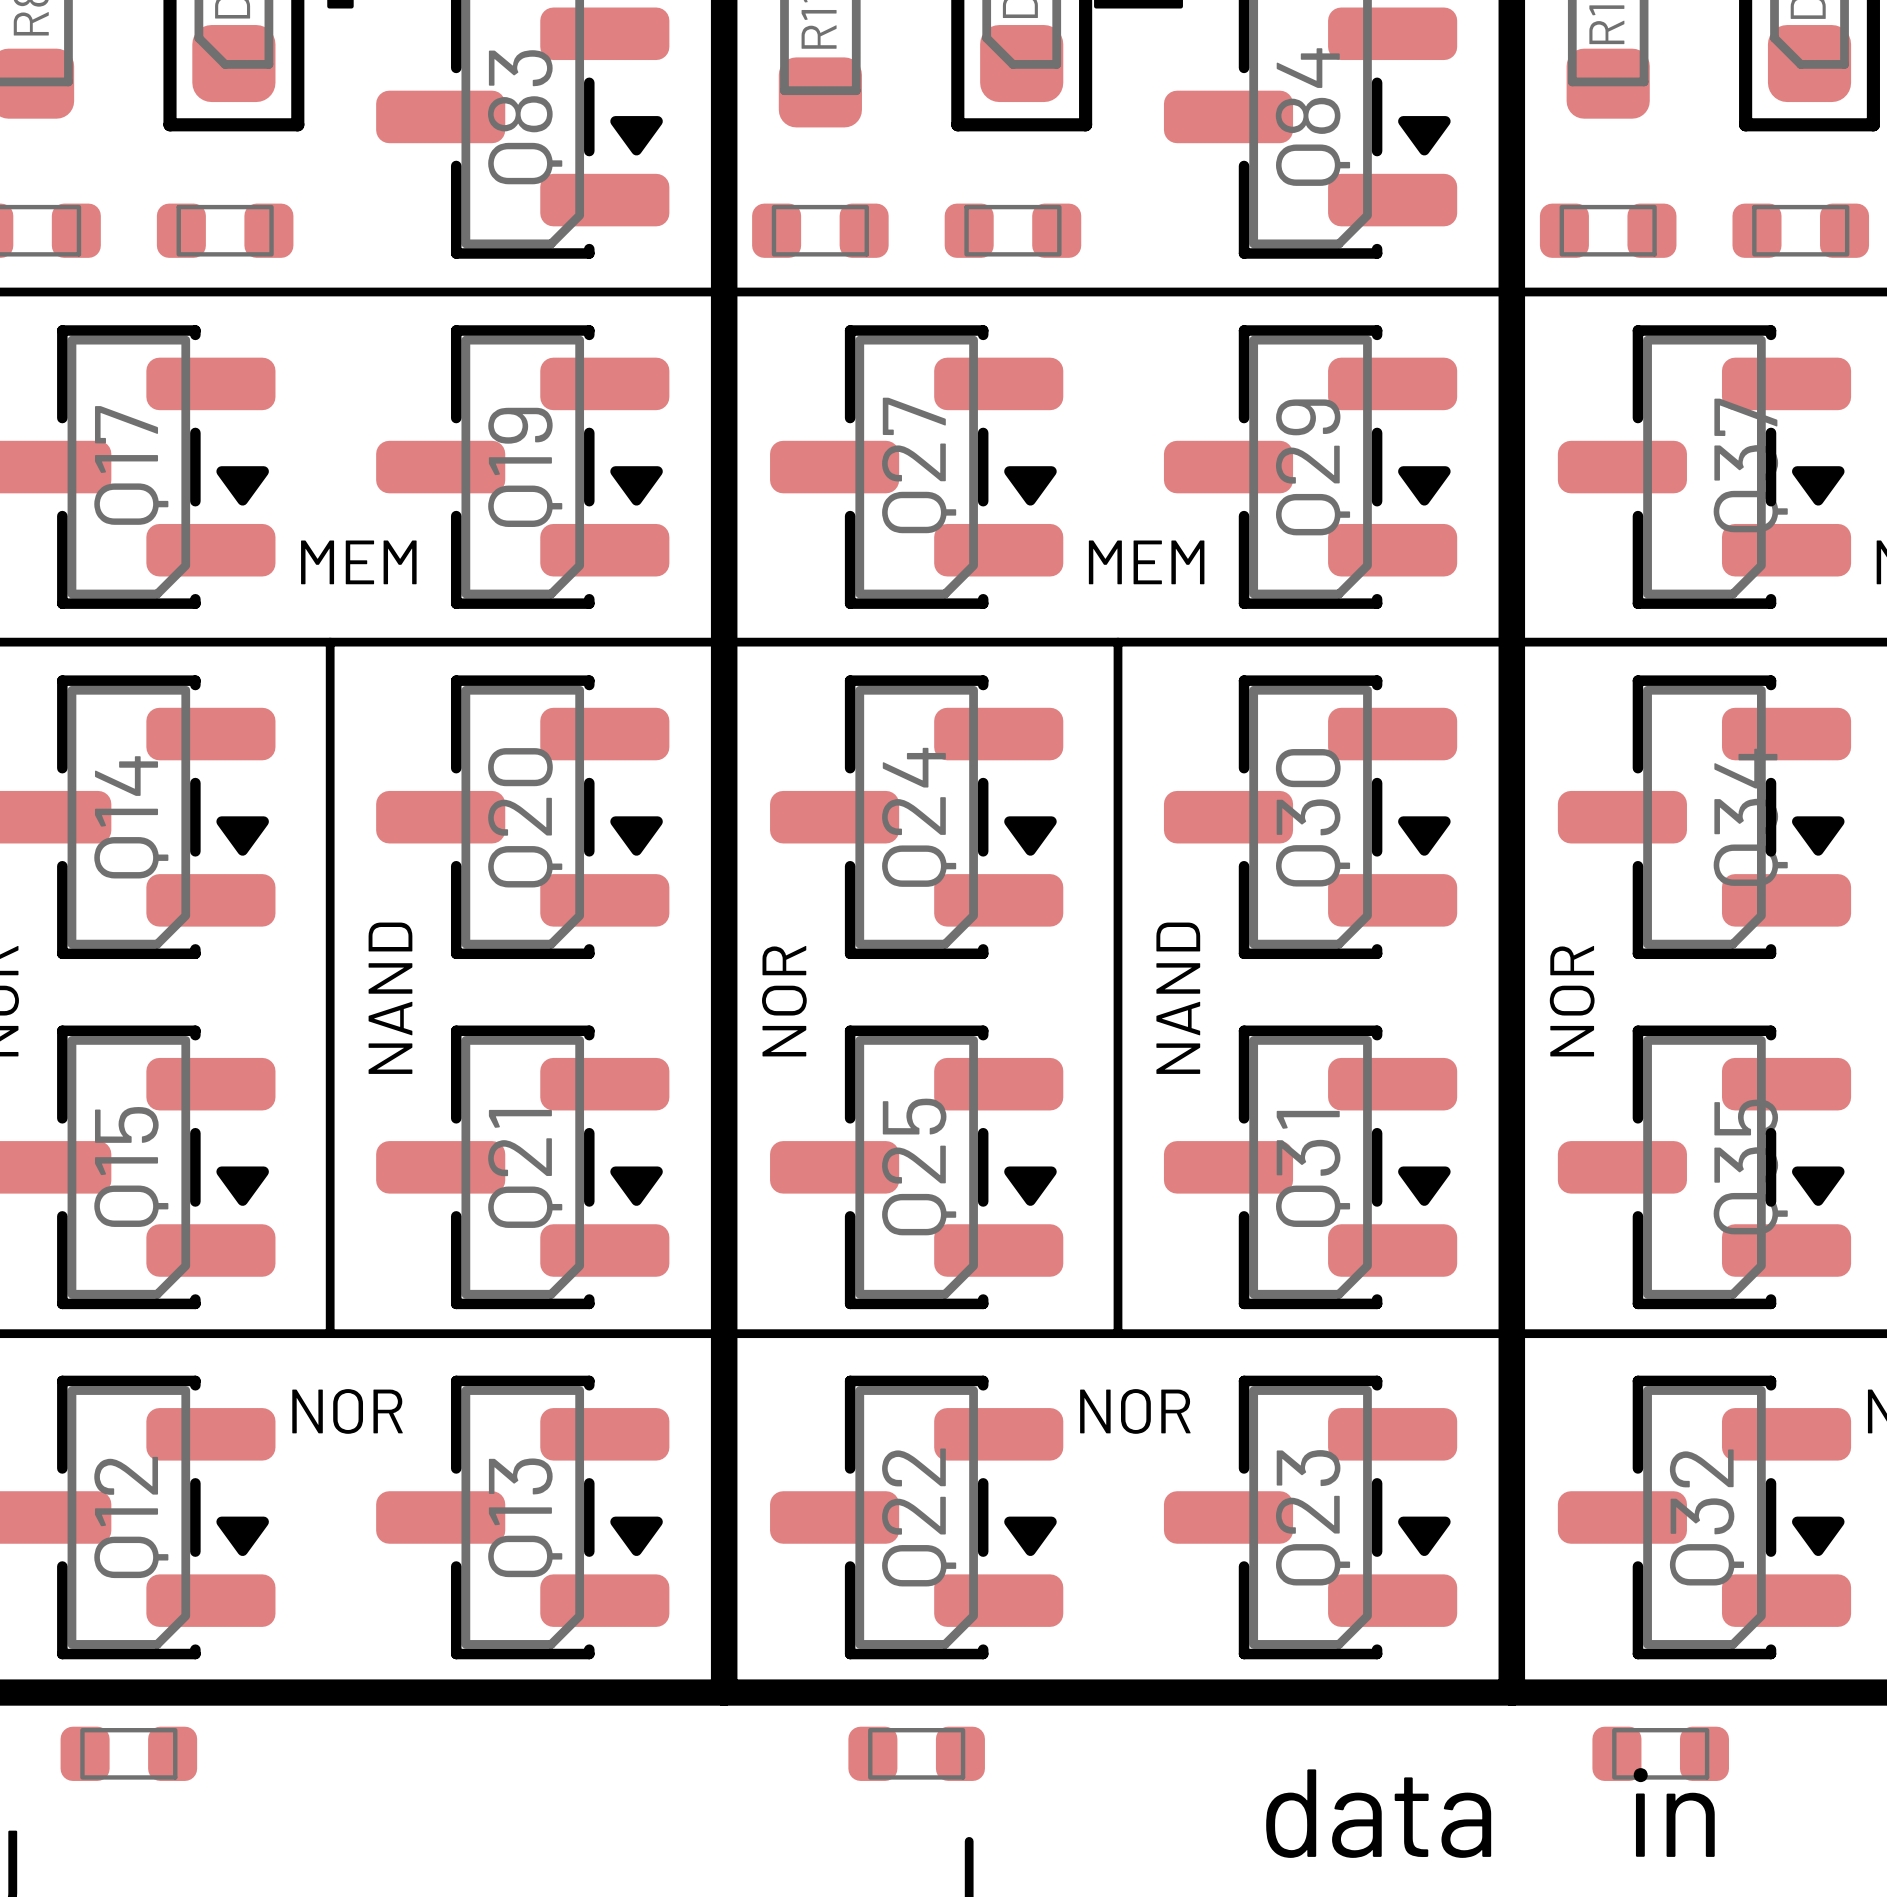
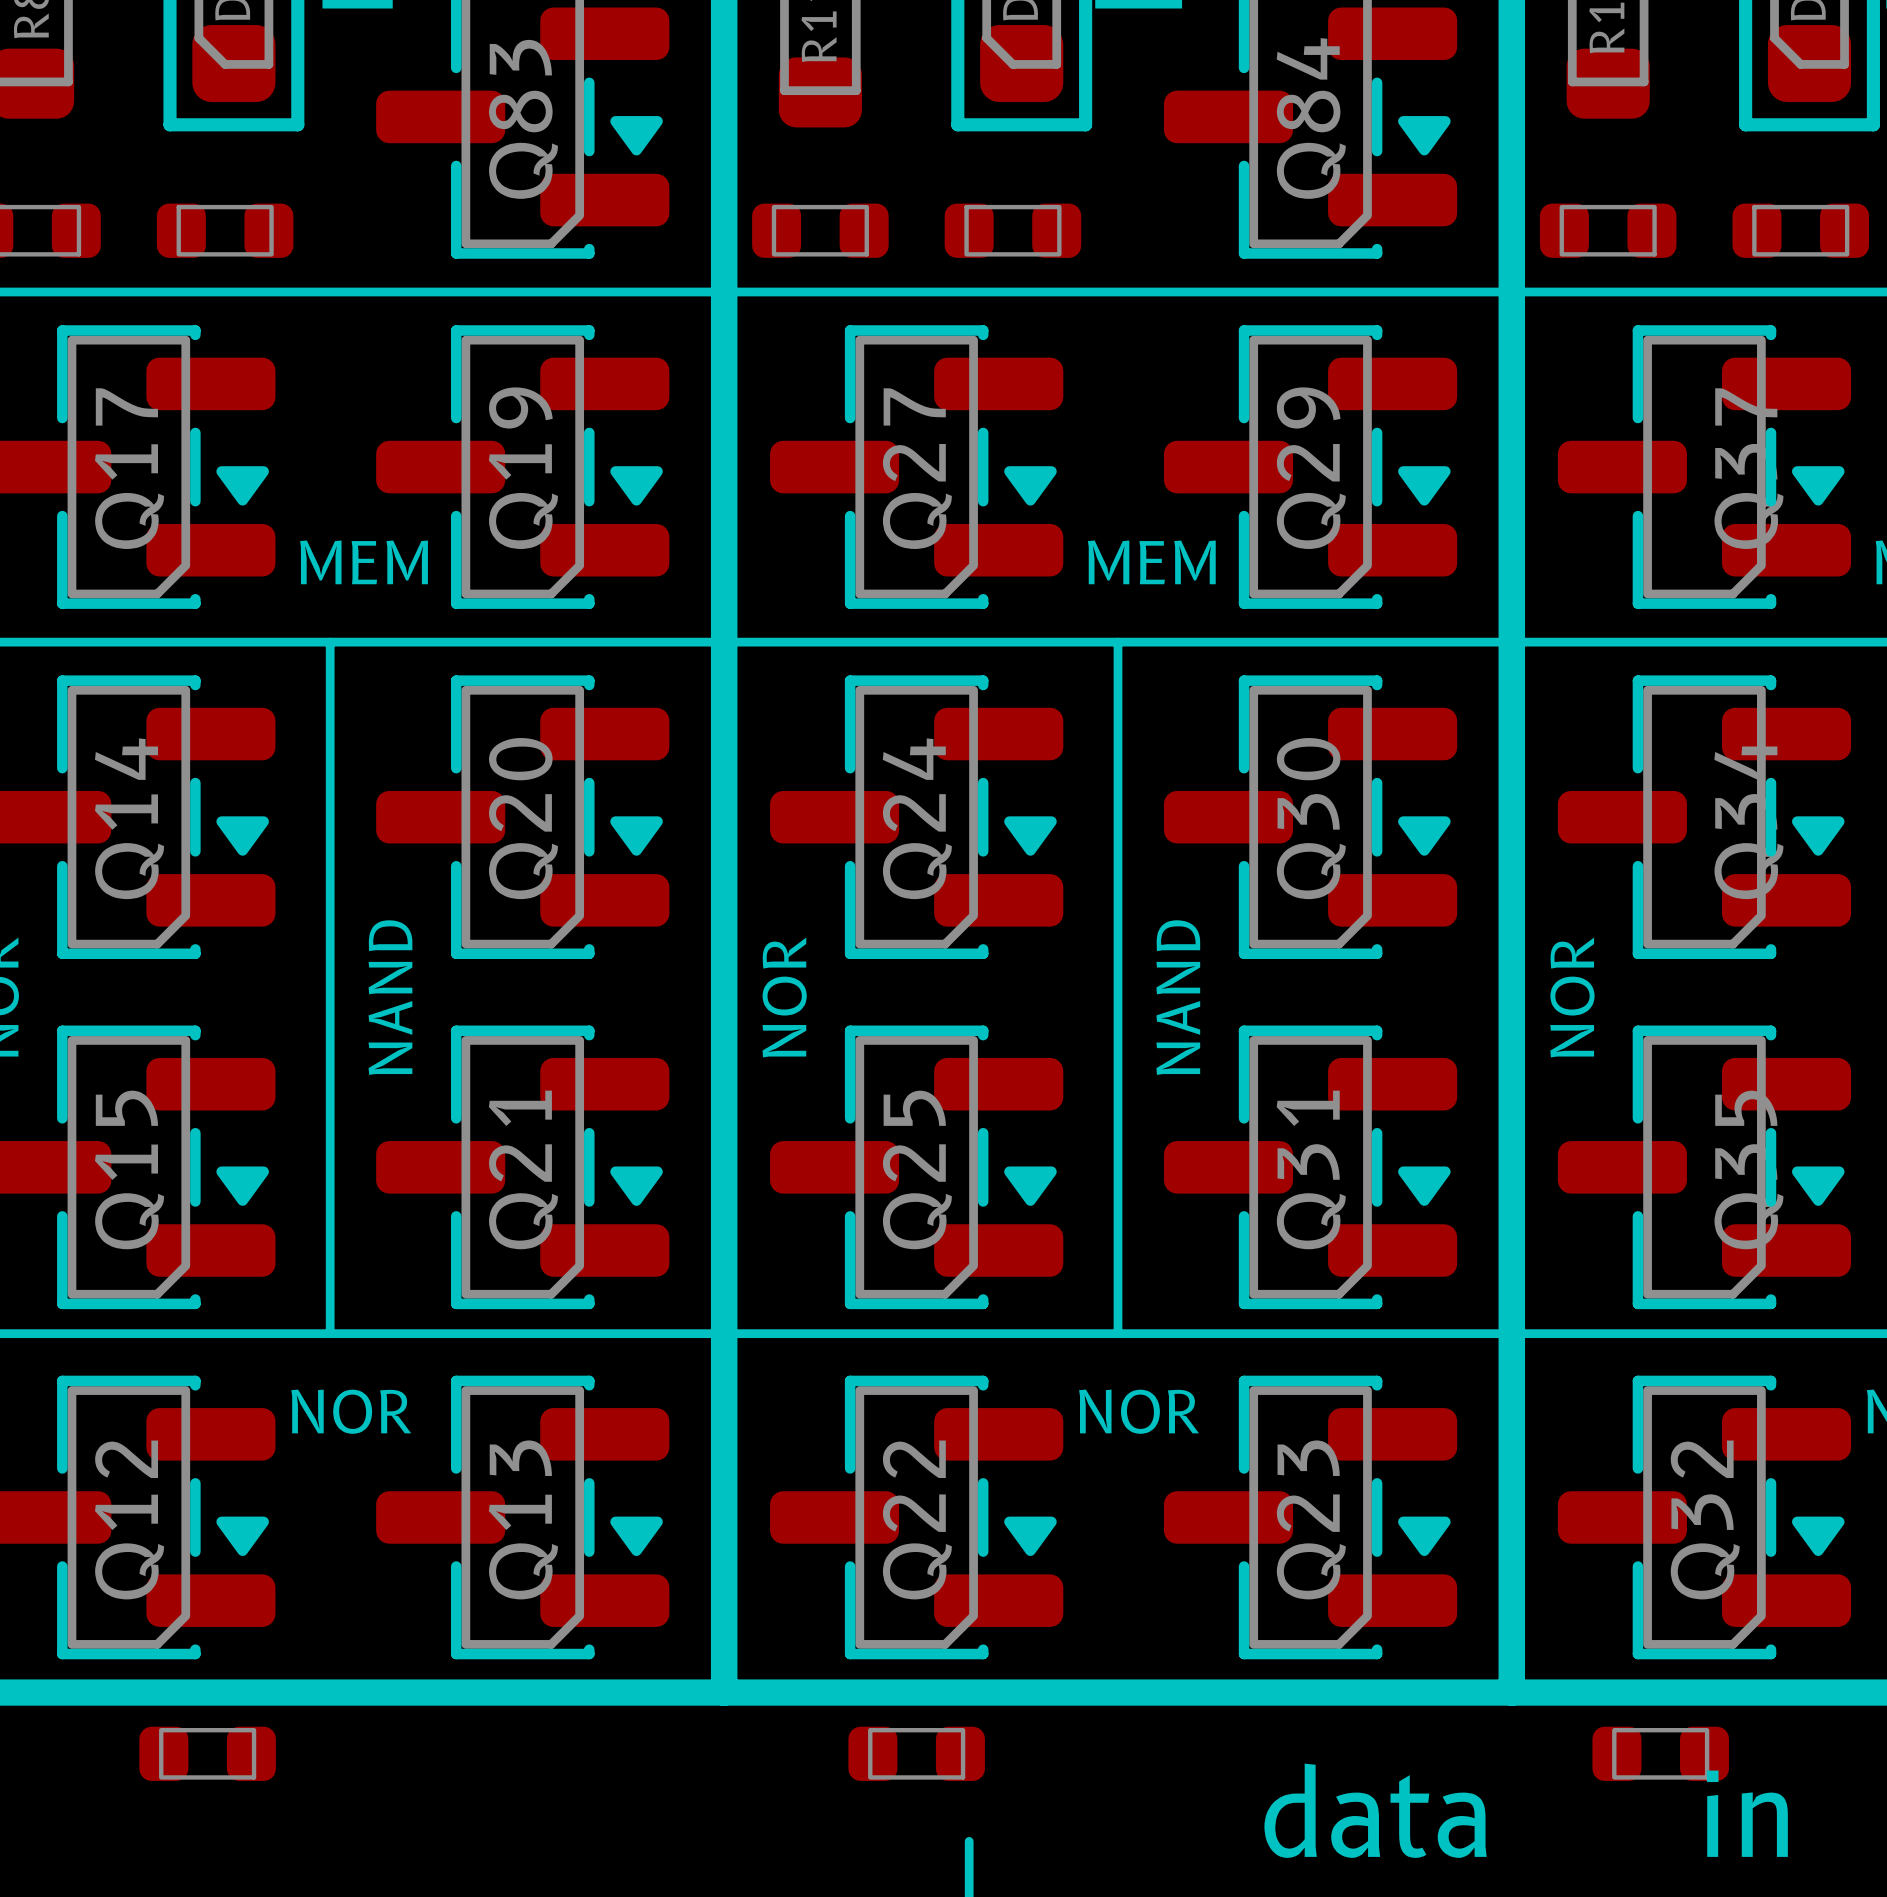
part position: (128, 1753) -> (207, 1753)

